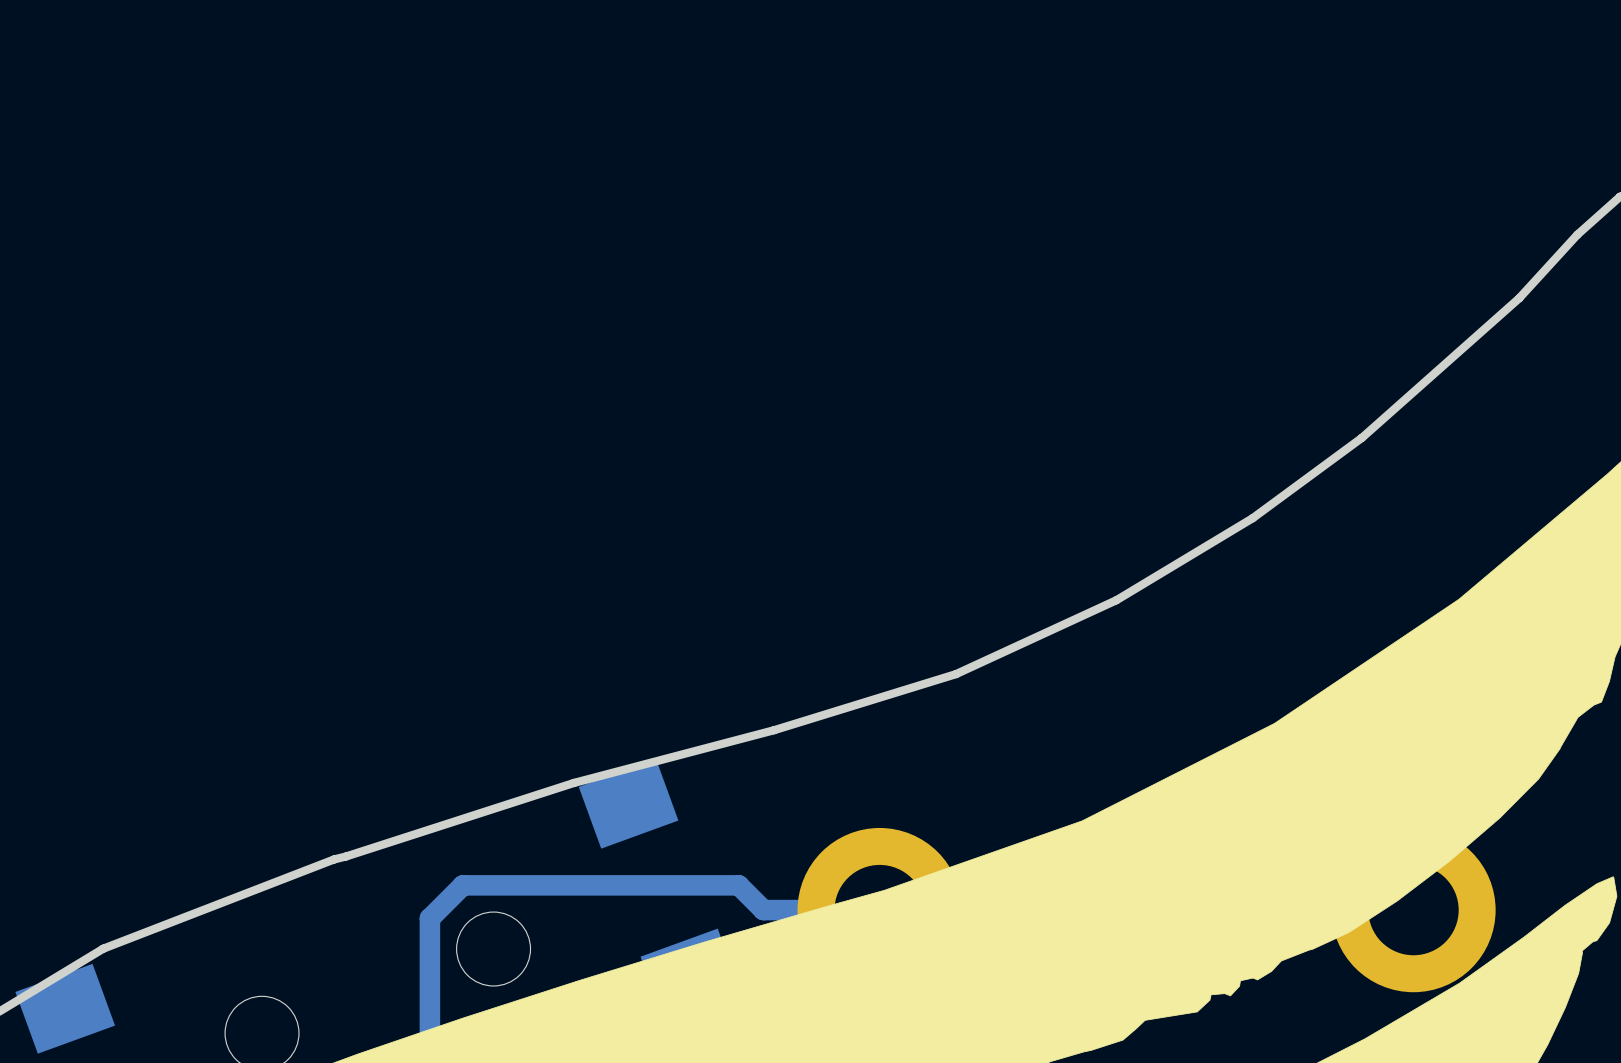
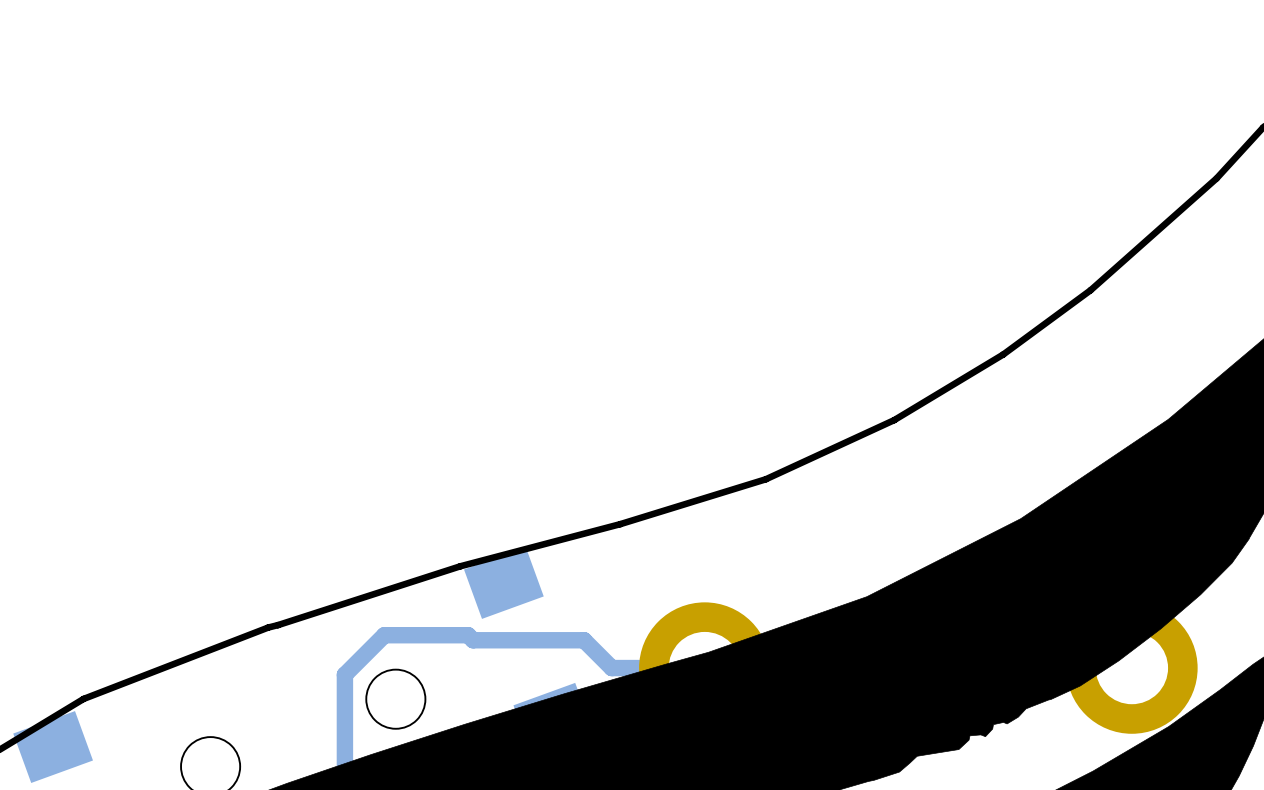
bottom track: (463, 885) (738, 885) -> (371, 648) (384, 635) (468, 635) (473, 640) (584, 640) (592, 648)

